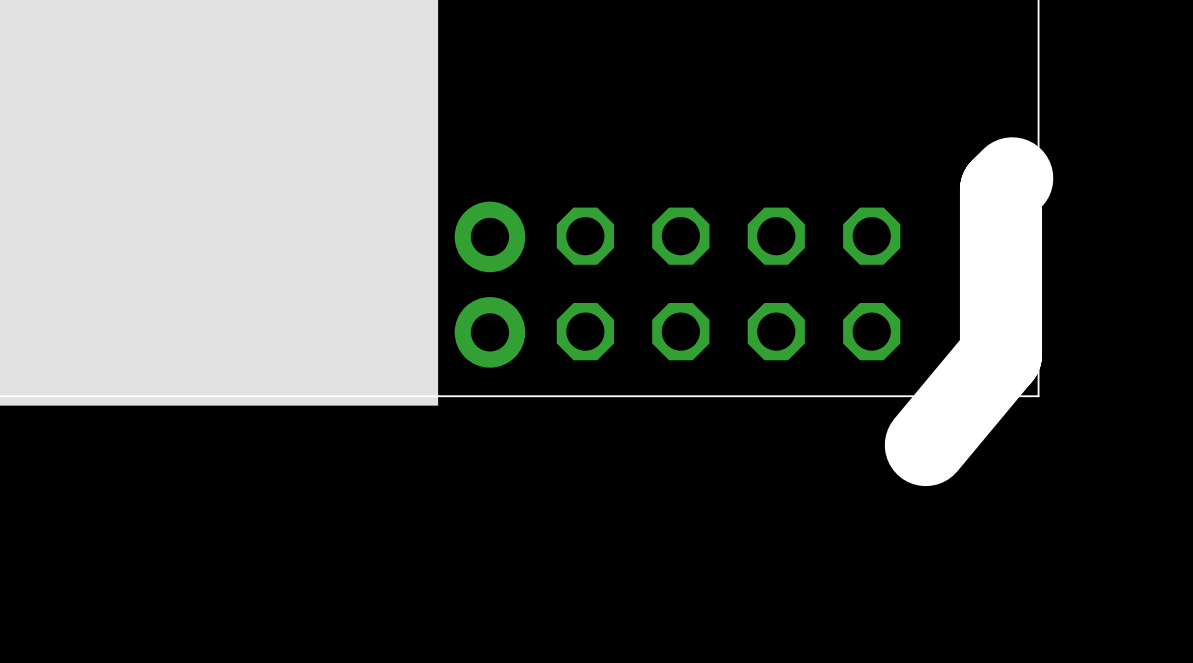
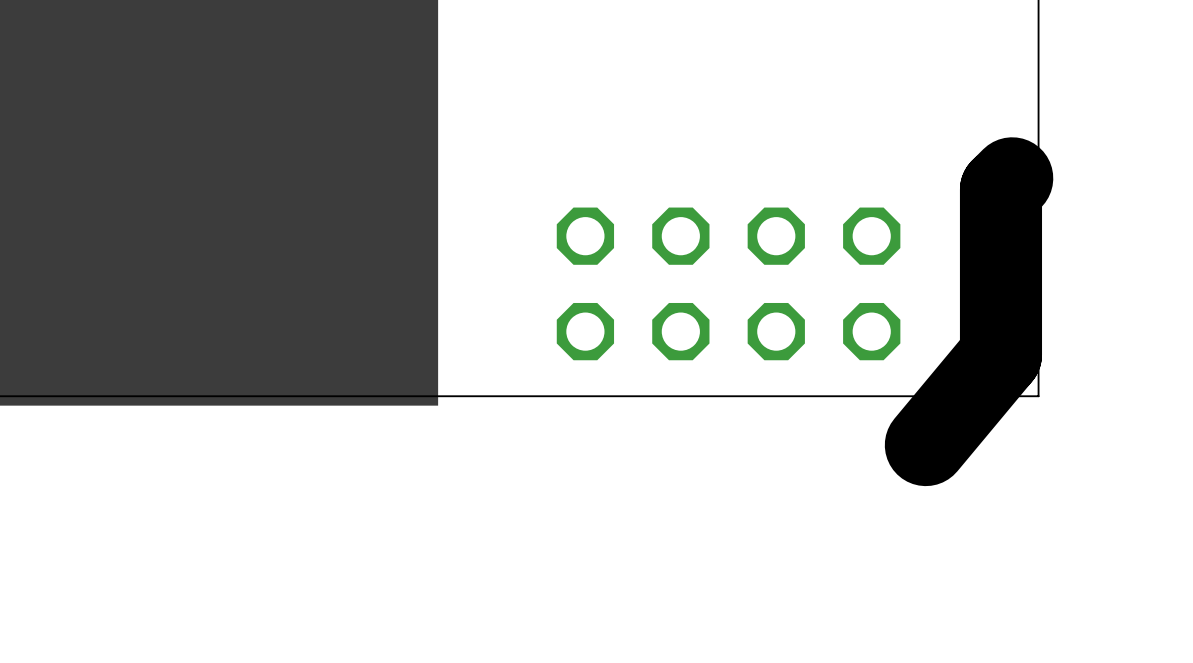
part: (489, 284) -> none

